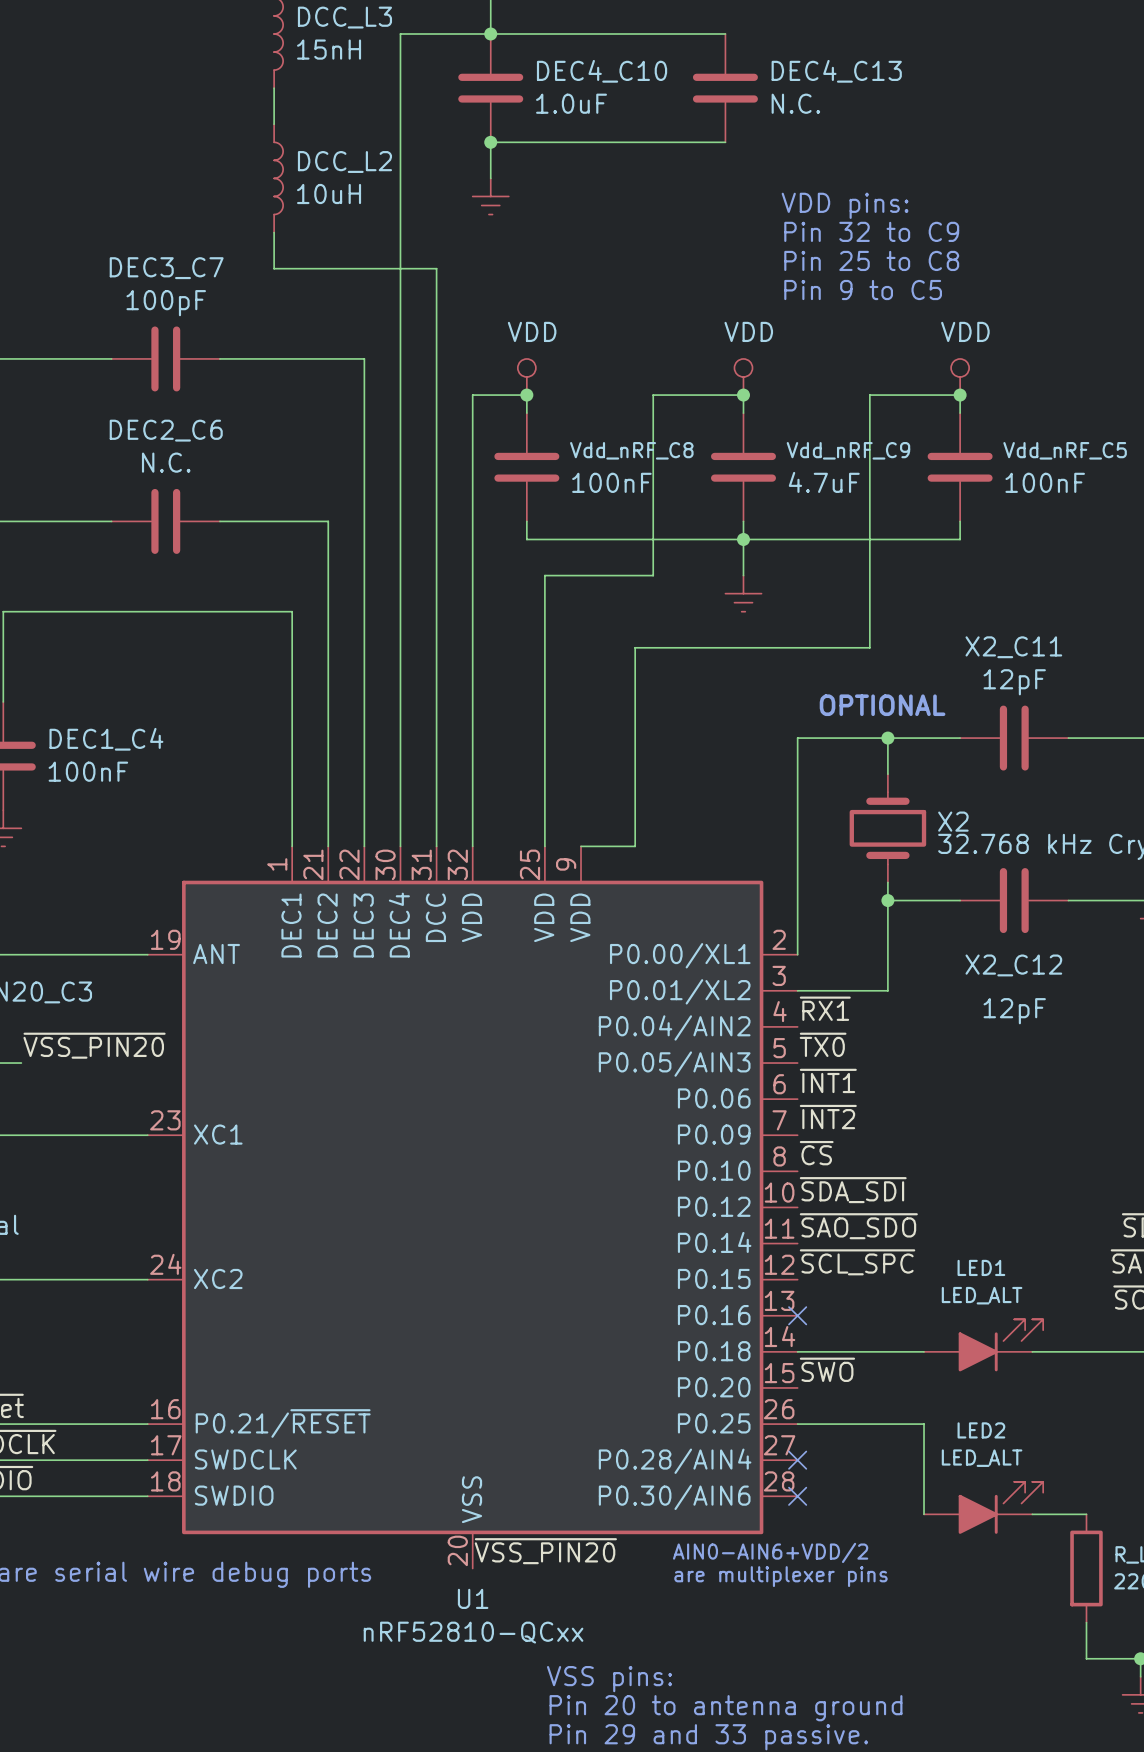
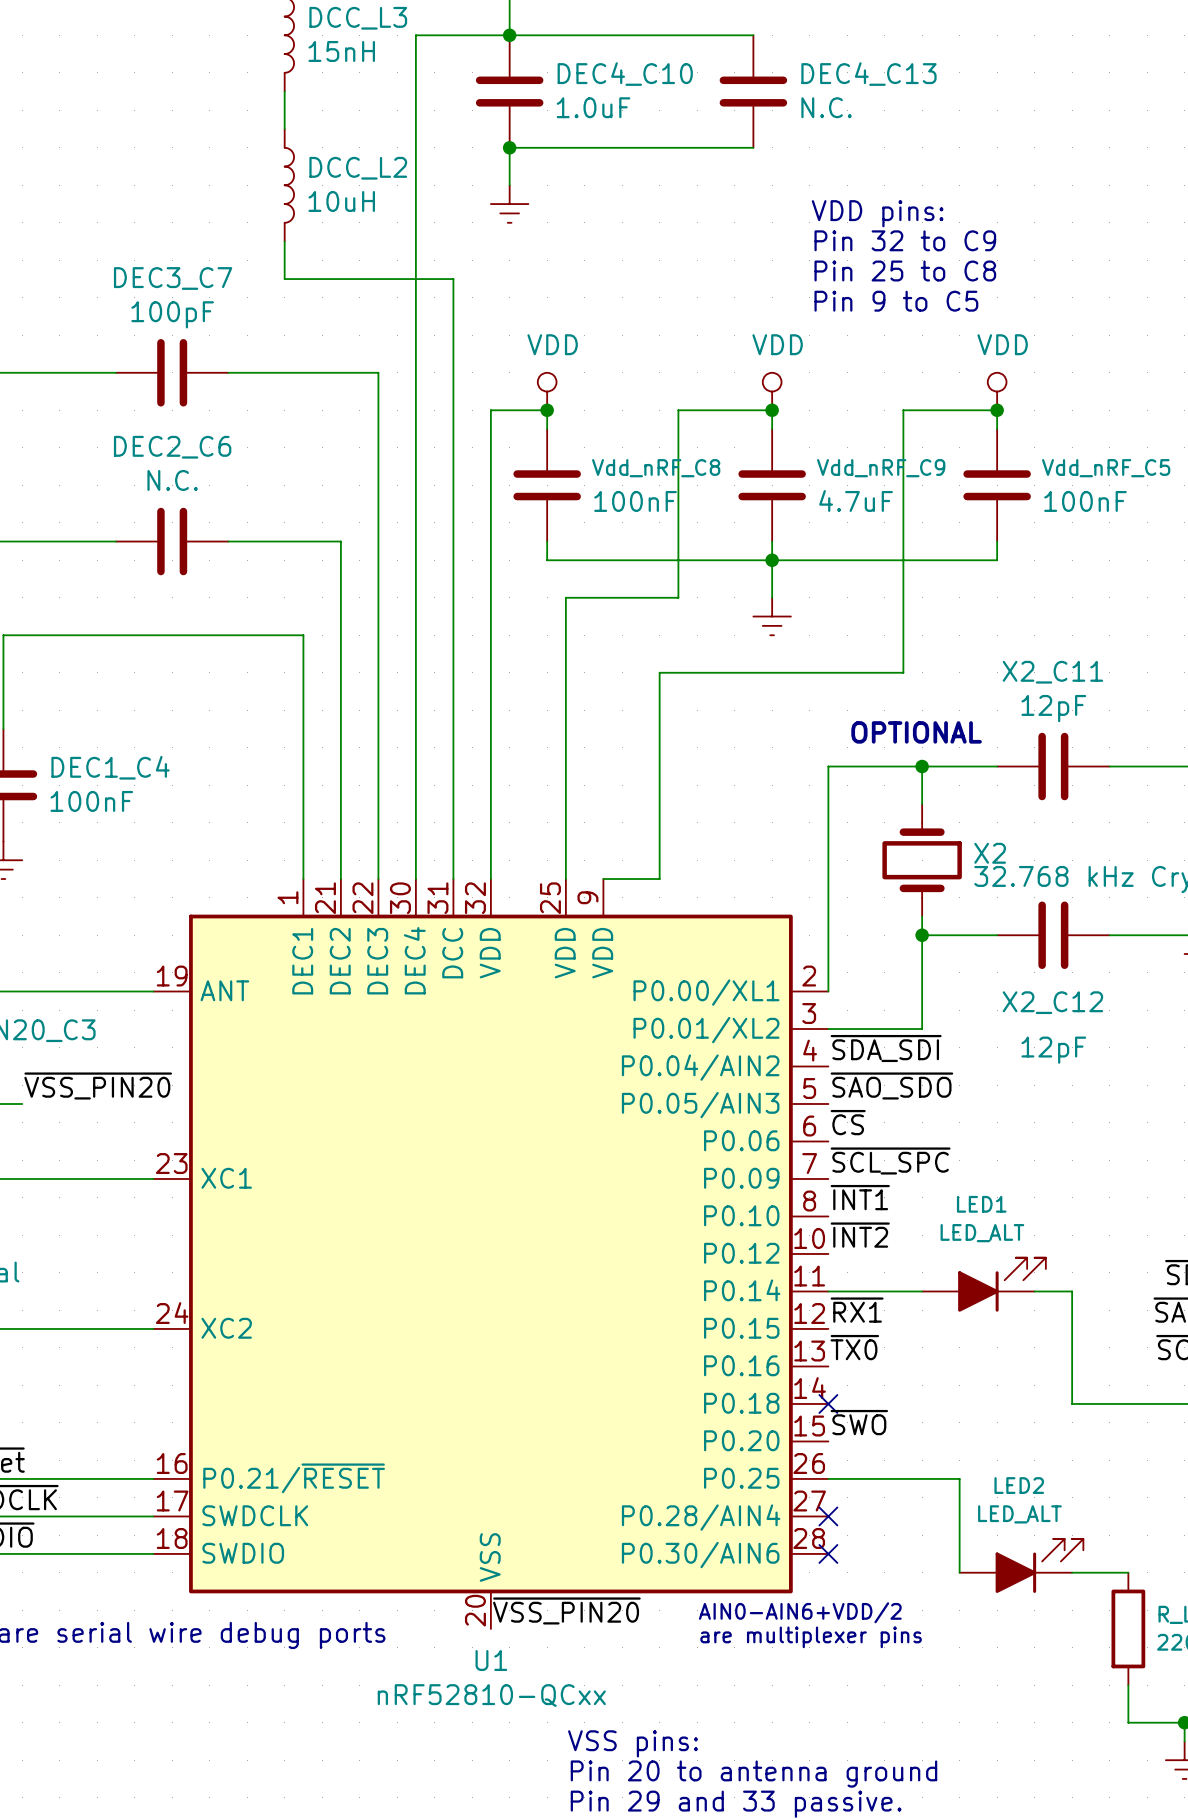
label: ~{RX1} (825, 1008) -> ~{SDA_SDI} (886, 1048)
label: ~{TX0} (823, 1044) -> ~{SAO_SDO} (891, 1086)
label: ~{INT1} (828, 1080) -> ~{CS} (848, 1122)
label: ~{INT2} (828, 1117) -> ~{SCL_SPC} (890, 1160)
label: ~{CS} (816, 1153) -> ~{INT1} (860, 1197)
label: ~{SDA_SDI} (853, 1190) -> ~{INT2} (860, 1235)
label: ~{SAO_SDO} (858, 1226) -> none
wire: none -> (828, 1291) (922, 1291)
wire: none -> (1034, 1291) (1072, 1291) (1072, 1403)
label: ~{SCL_SPC} (857, 1262) -> ~{RX1} (857, 1310)
label: none -> ~{TX0} (854, 1347)
no-connect mark position: (797, 1315) -> (828, 1403)
LED1 position: (983, 1345) -> (984, 1284)
wire: (797, 1351) (924, 1351) -> none

